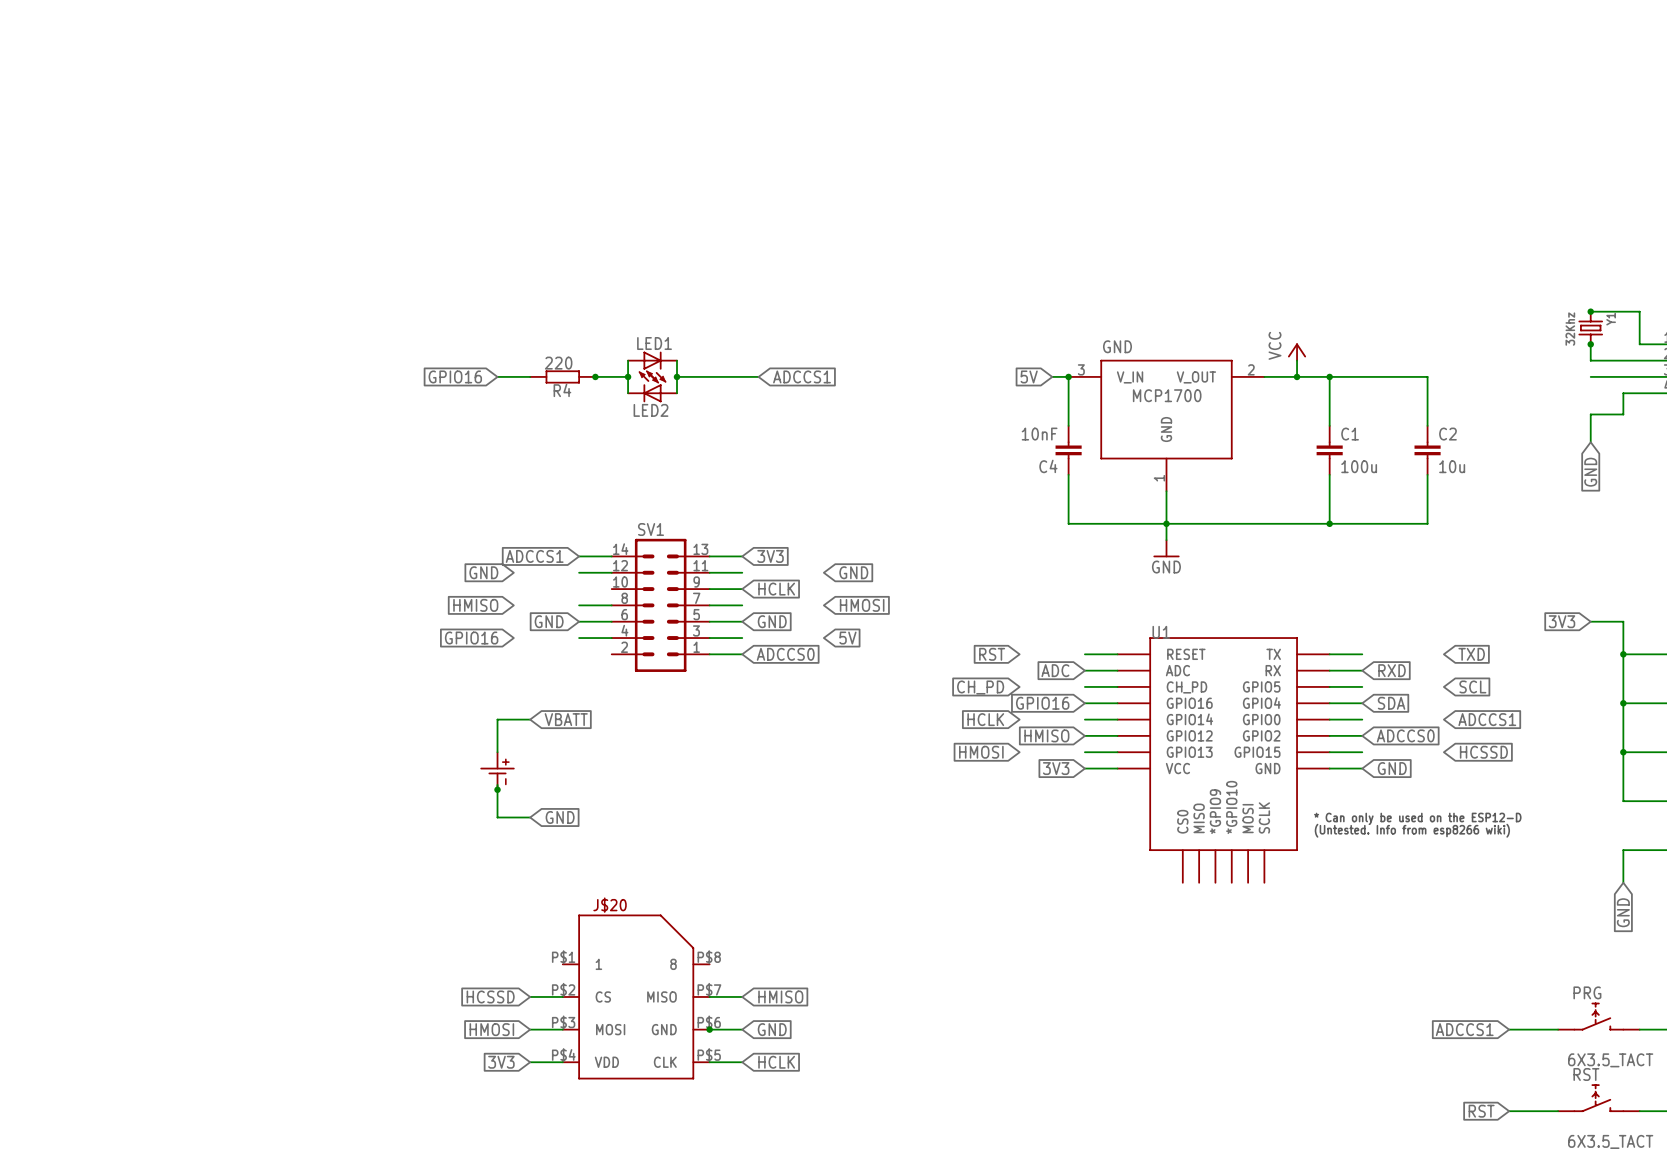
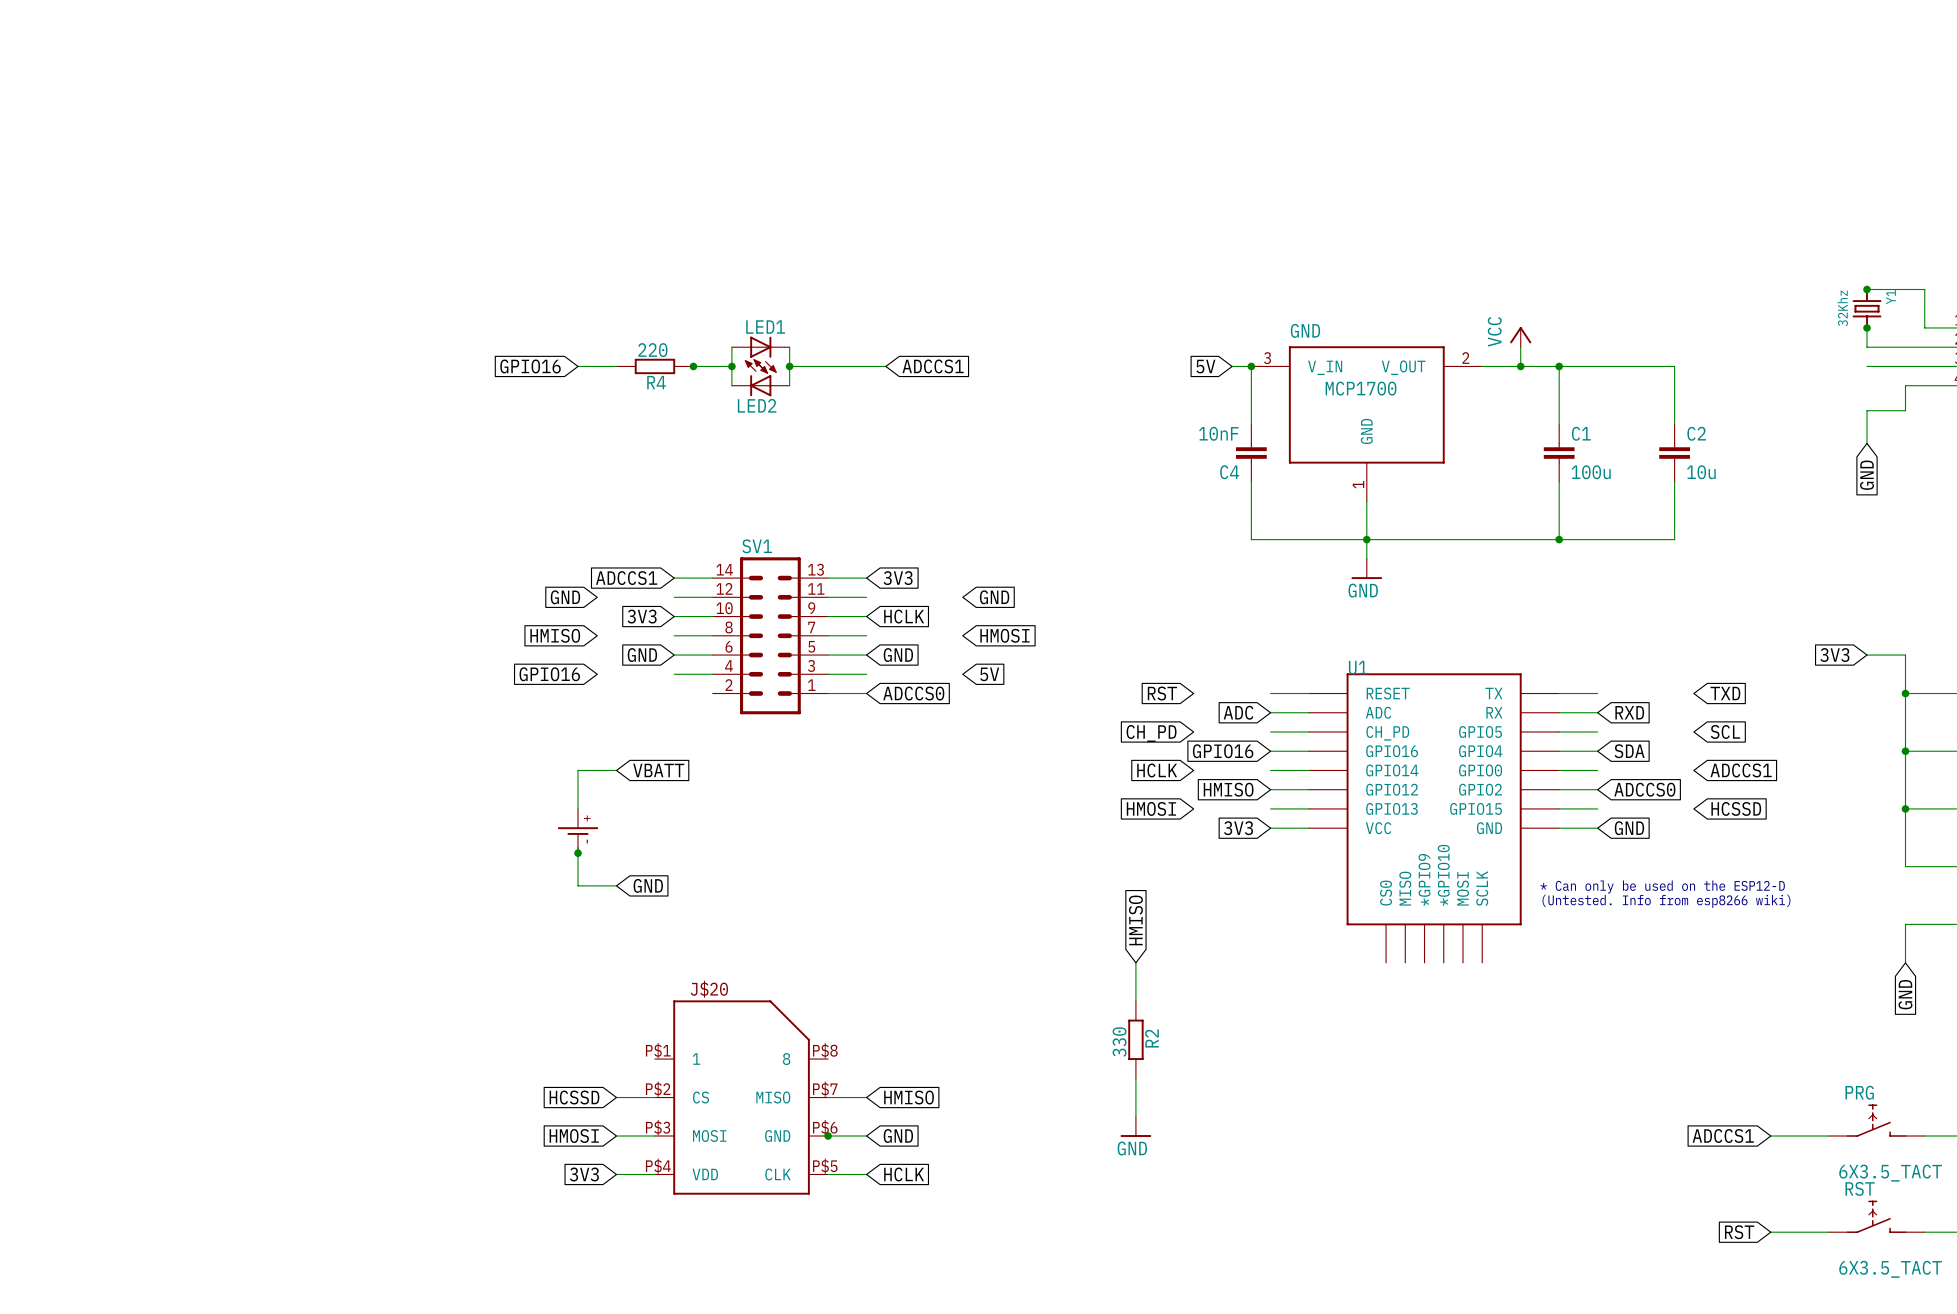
global label: none -> 3V3 (642, 616)
wire: none -> (674, 616) (712, 616)
global label: none -> HMISO (1135, 920)
wire: none -> (1135, 962) (1135, 1001)
R2: none -> 330 (1135, 1039)
wire: none -> (1135, 1078) (1135, 1116)
power symbol: none -> GND (1135, 1126)

